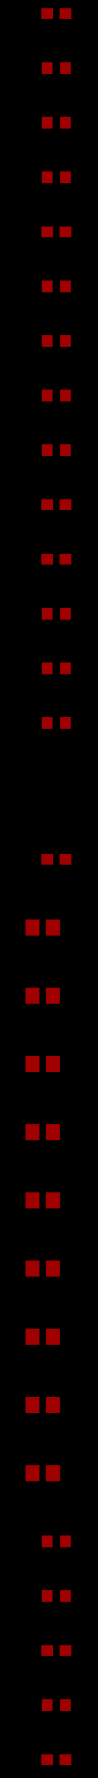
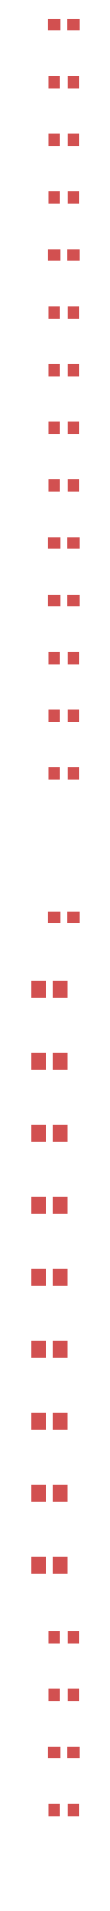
part: (56, 1759) -> none

